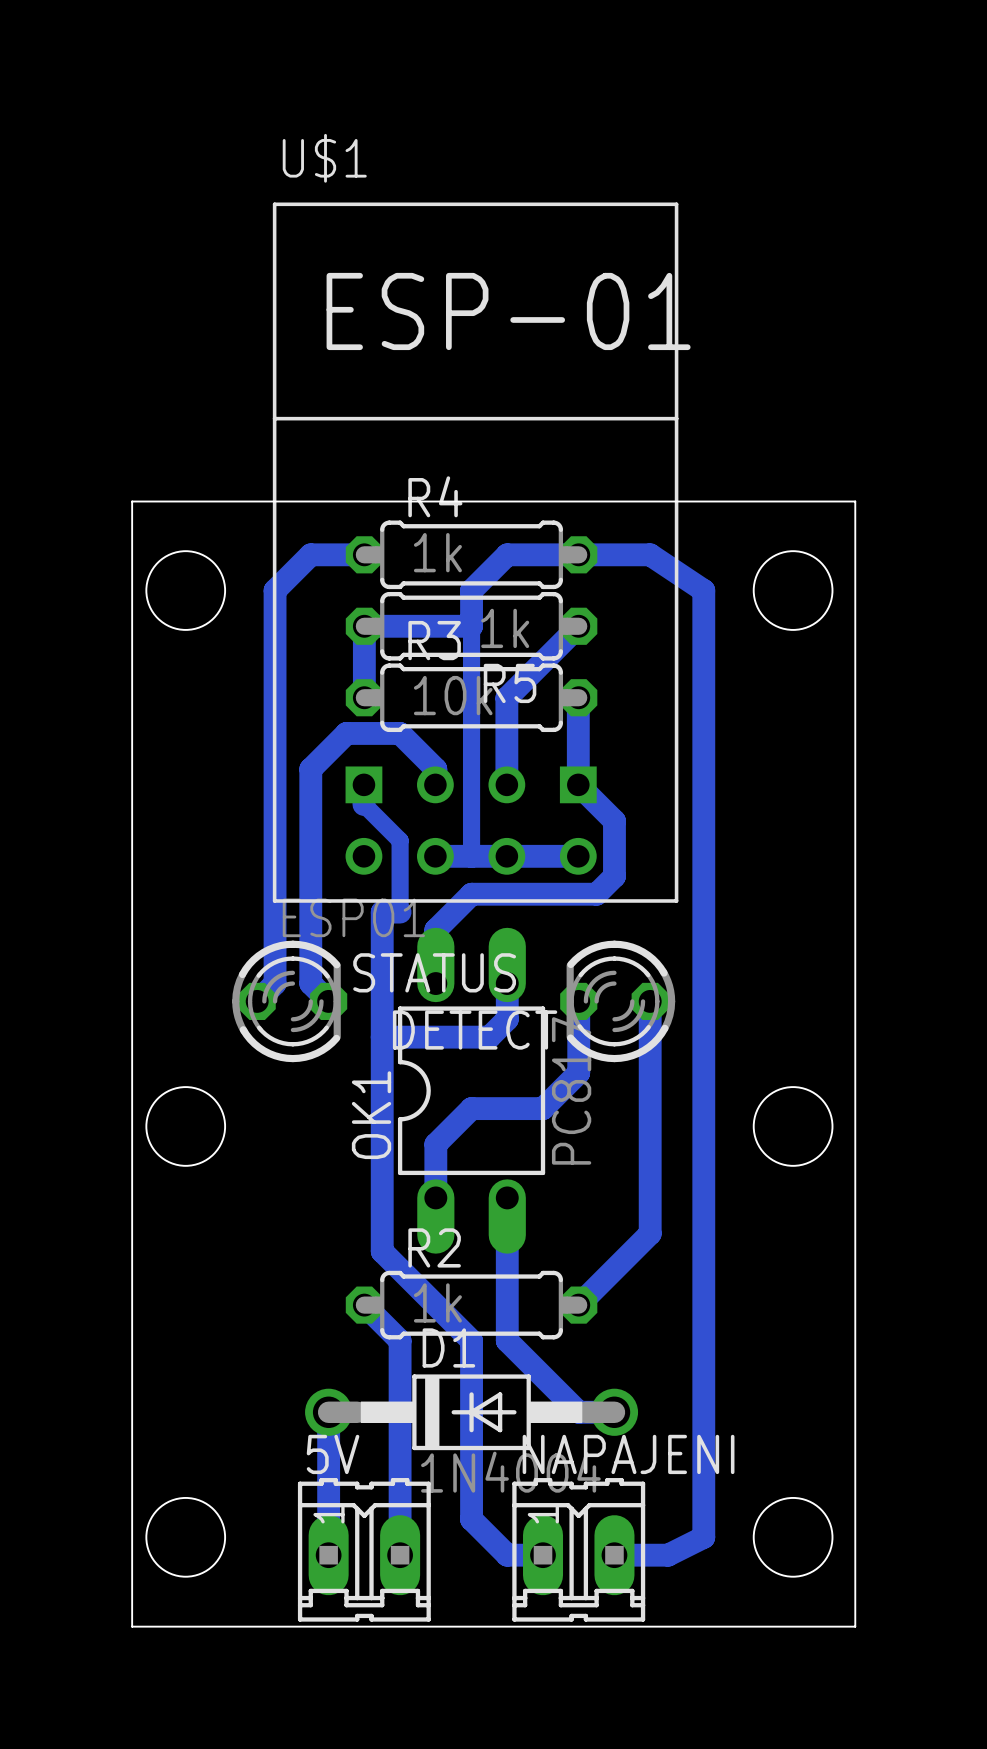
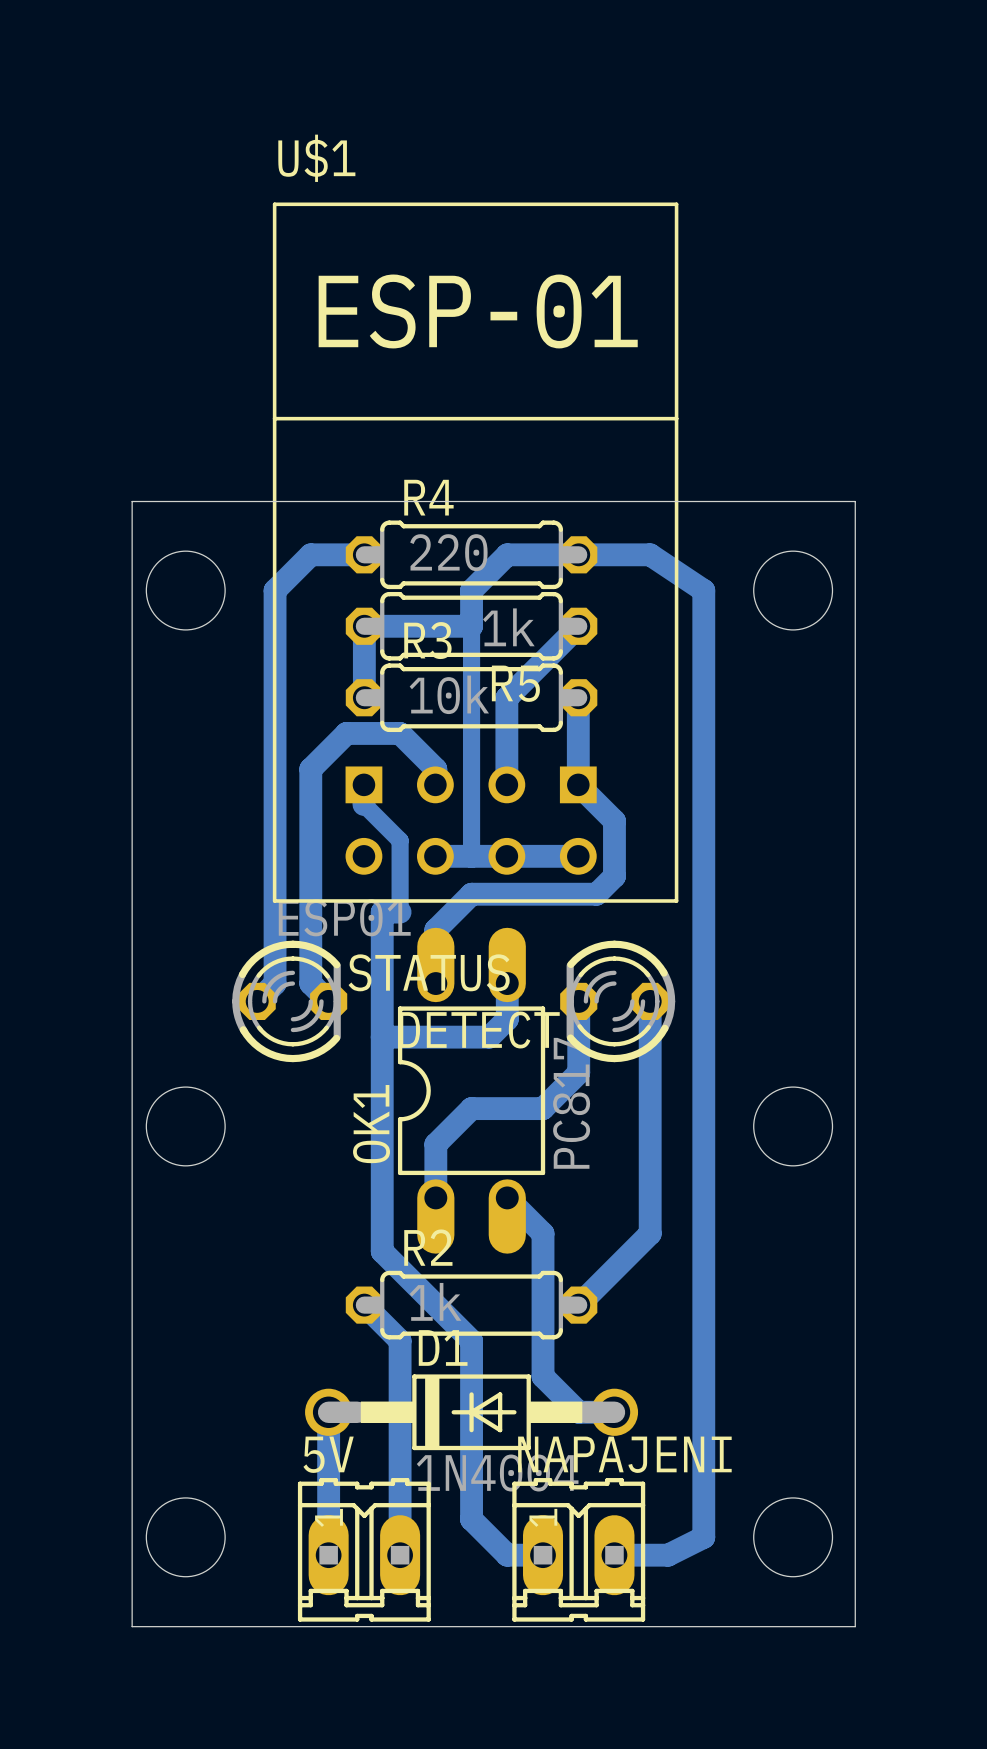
R4 value: 1k (437, 552) -> 220 (448, 552)
bottom track: (507, 1197) (507, 1340) (543, 1376) -> (507, 1197) (543, 1233) (543, 1376)

